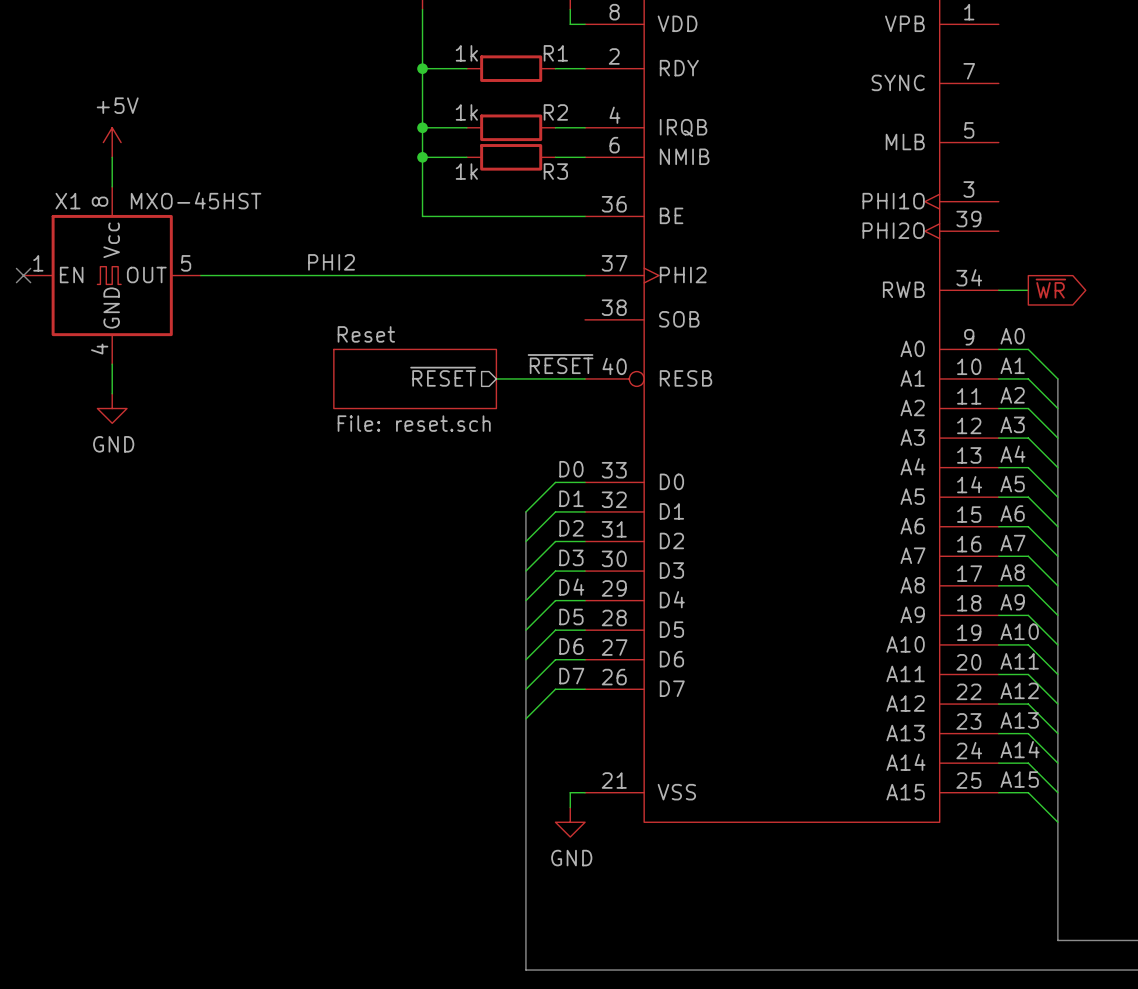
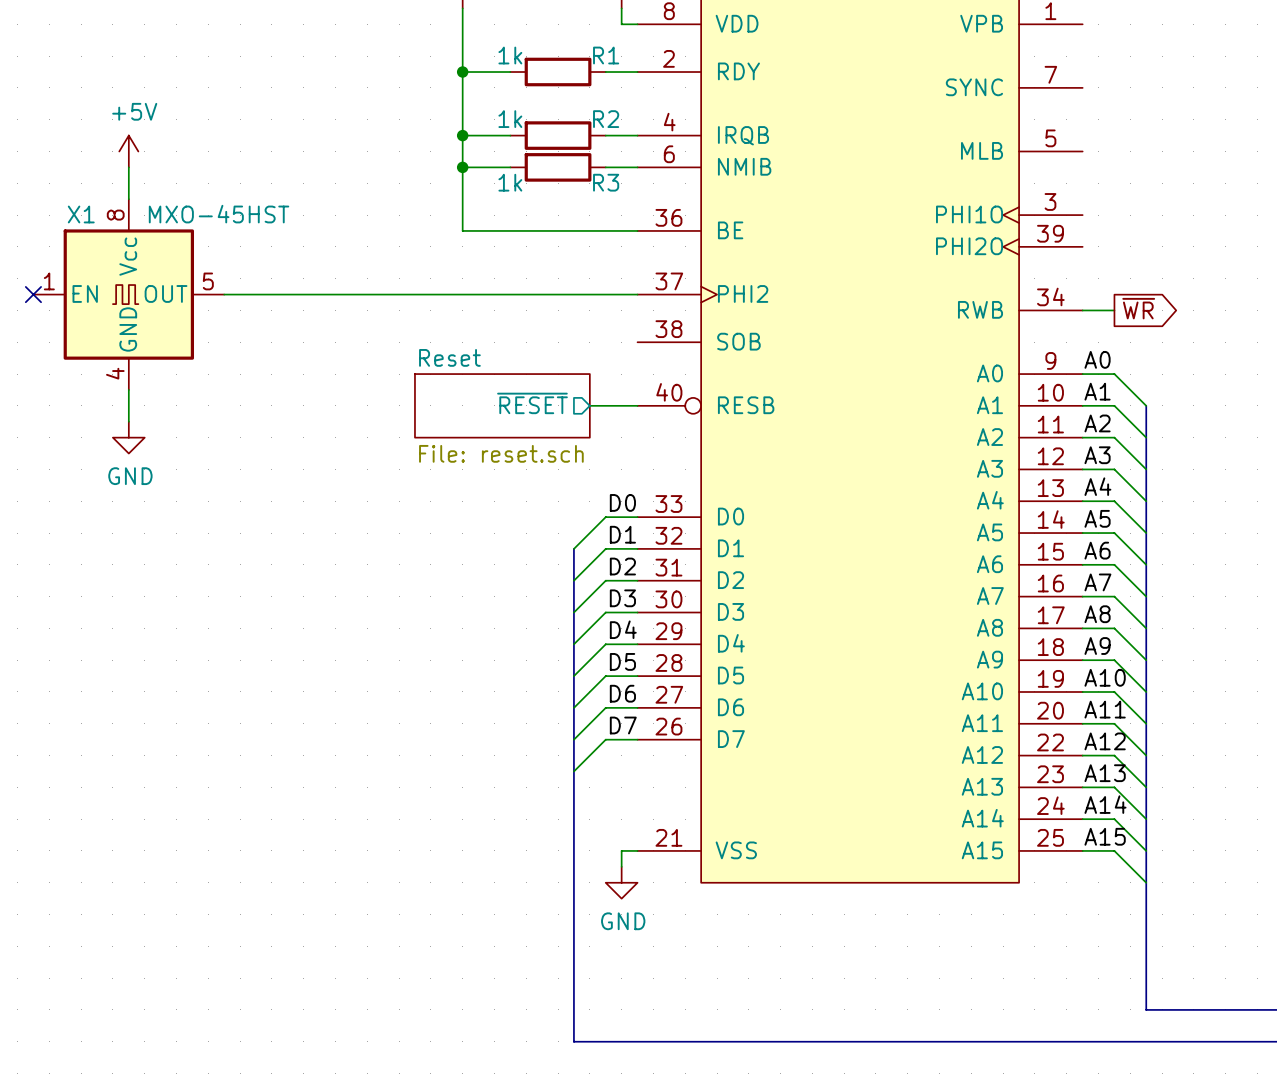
label: PHI2 (331, 262) -> none
label: ~{RESET} (560, 364) -> none
sheet pin position: ~{RESET} (443, 376) -> ~{RESET} (532, 403)
sheet Reset position: (415, 378) -> (502, 405)
wire: (496, 378) (540, 378) -> none

